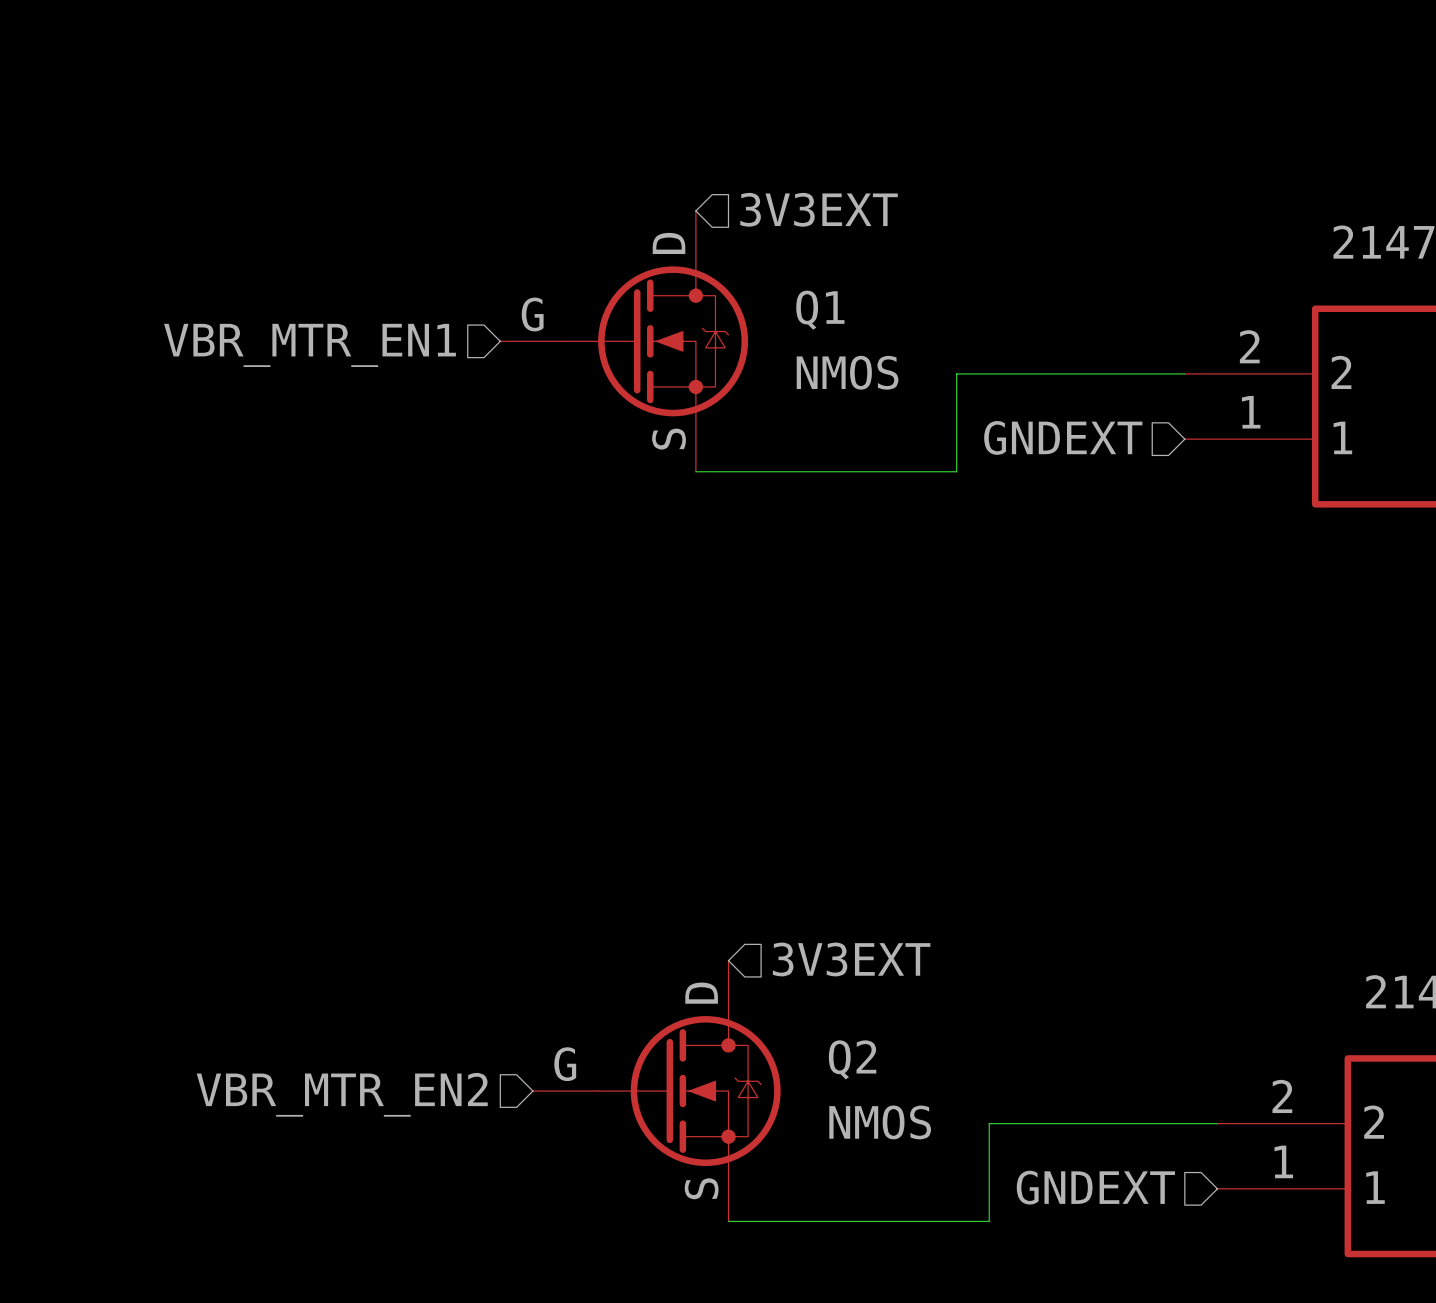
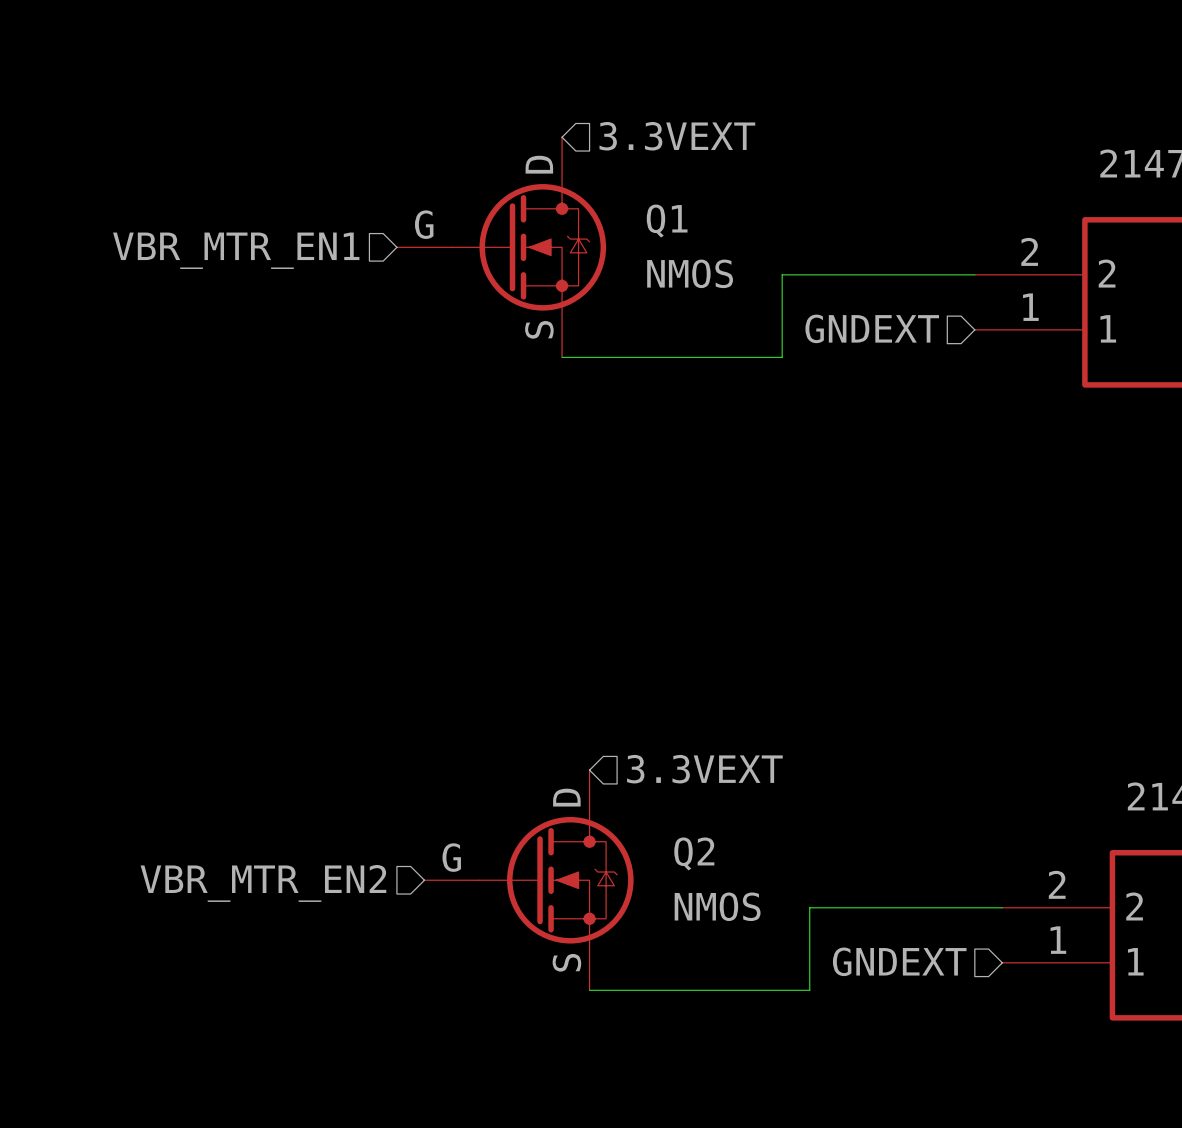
hierarchical label: 3V3EXT (819, 209) -> 3.3VEXT (677, 136)
hierarchical label: 3V3EXT (851, 959) -> 3.3VEXT (704, 769)

